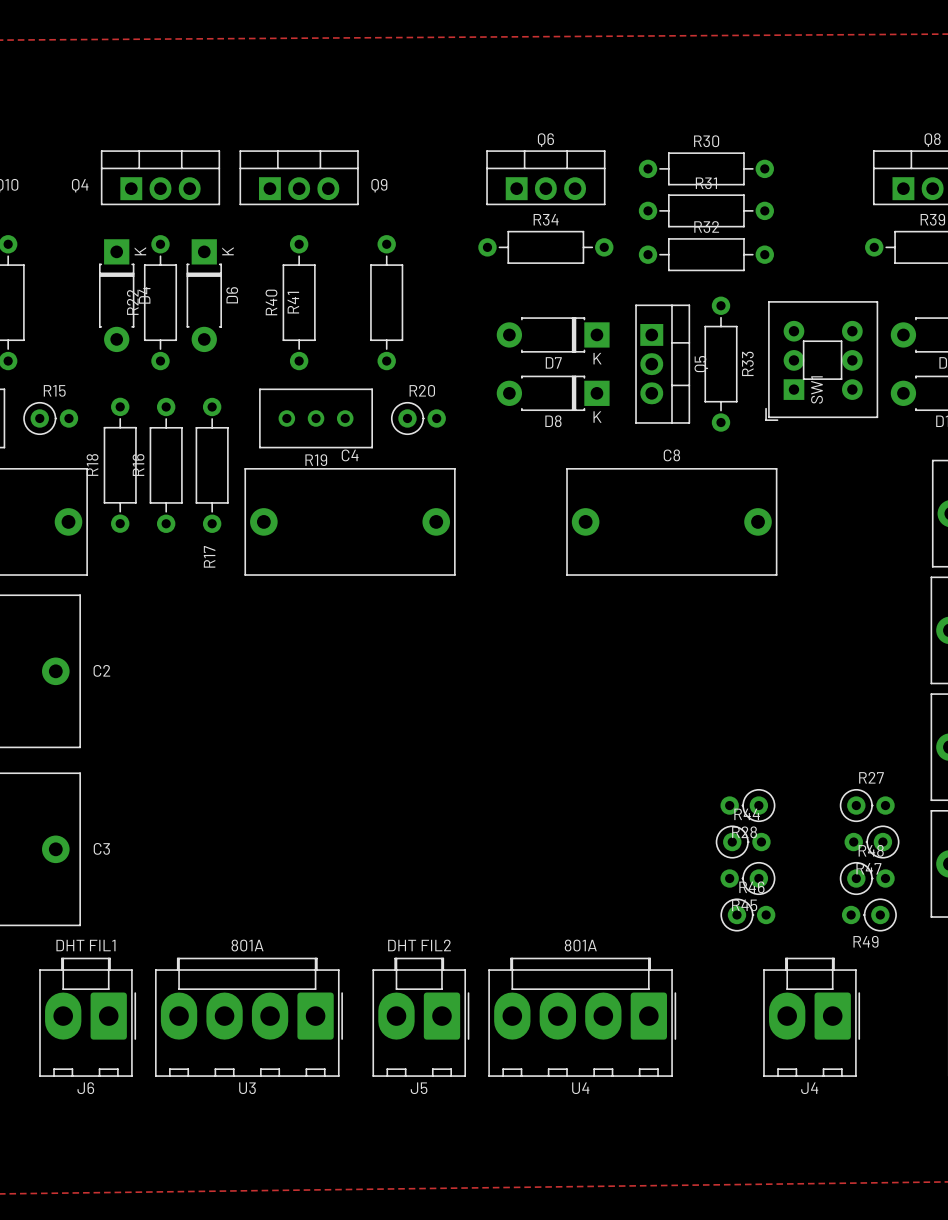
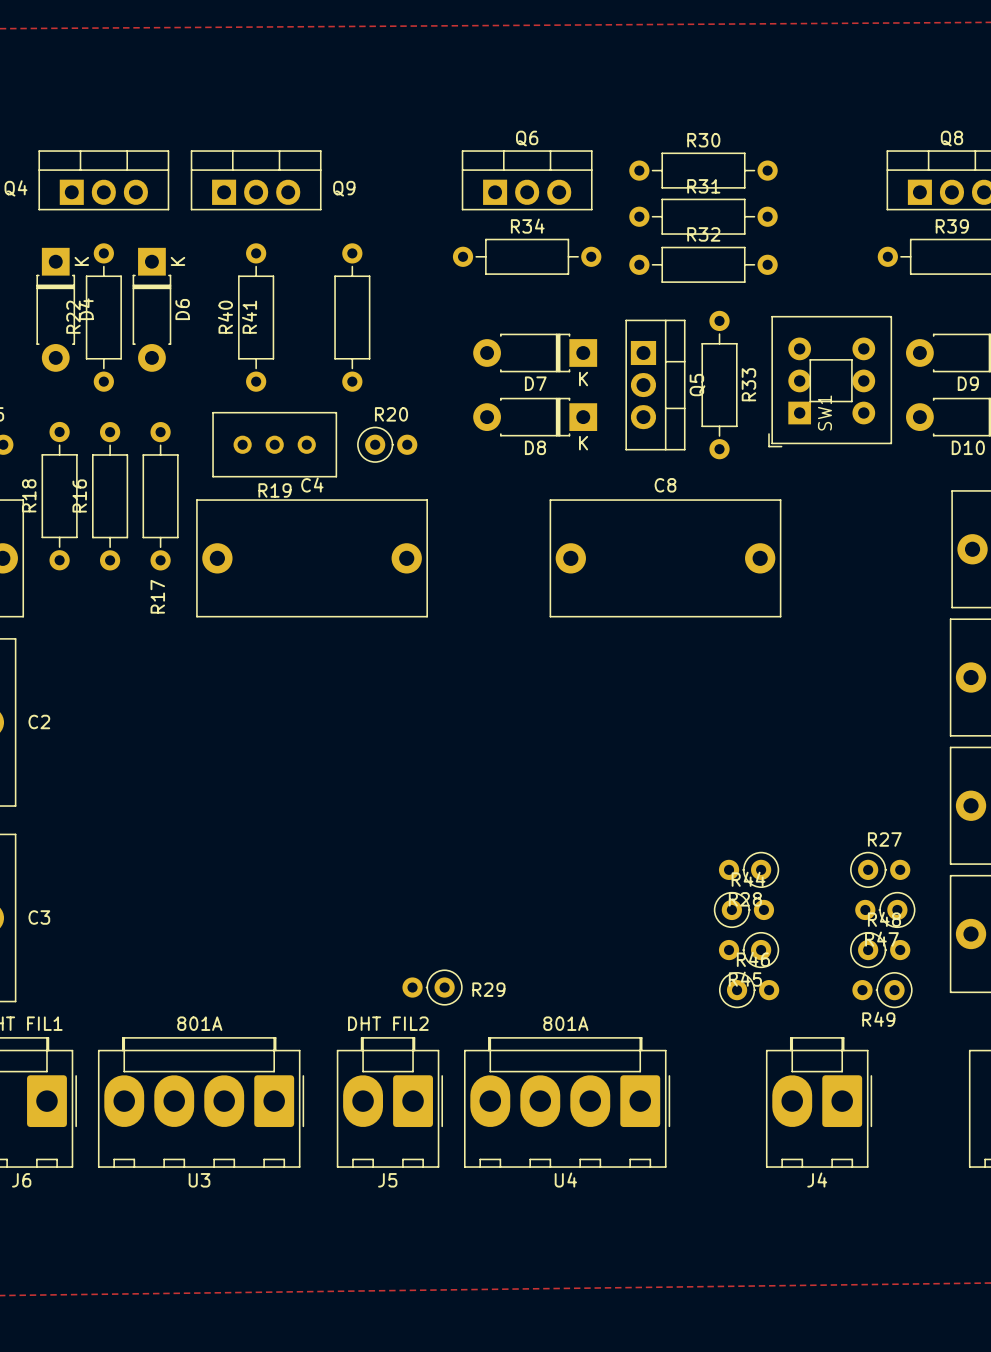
R29: none -> (432, 987)

